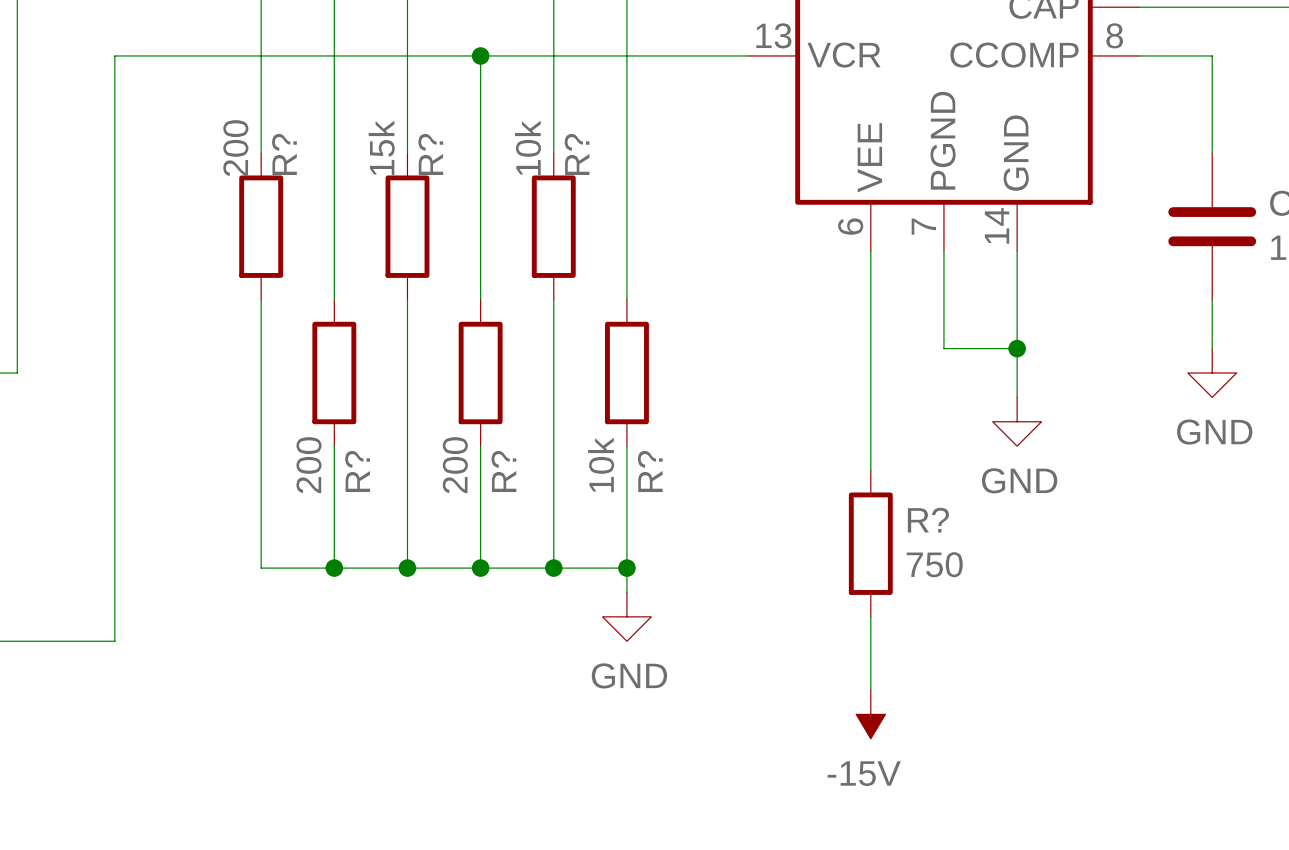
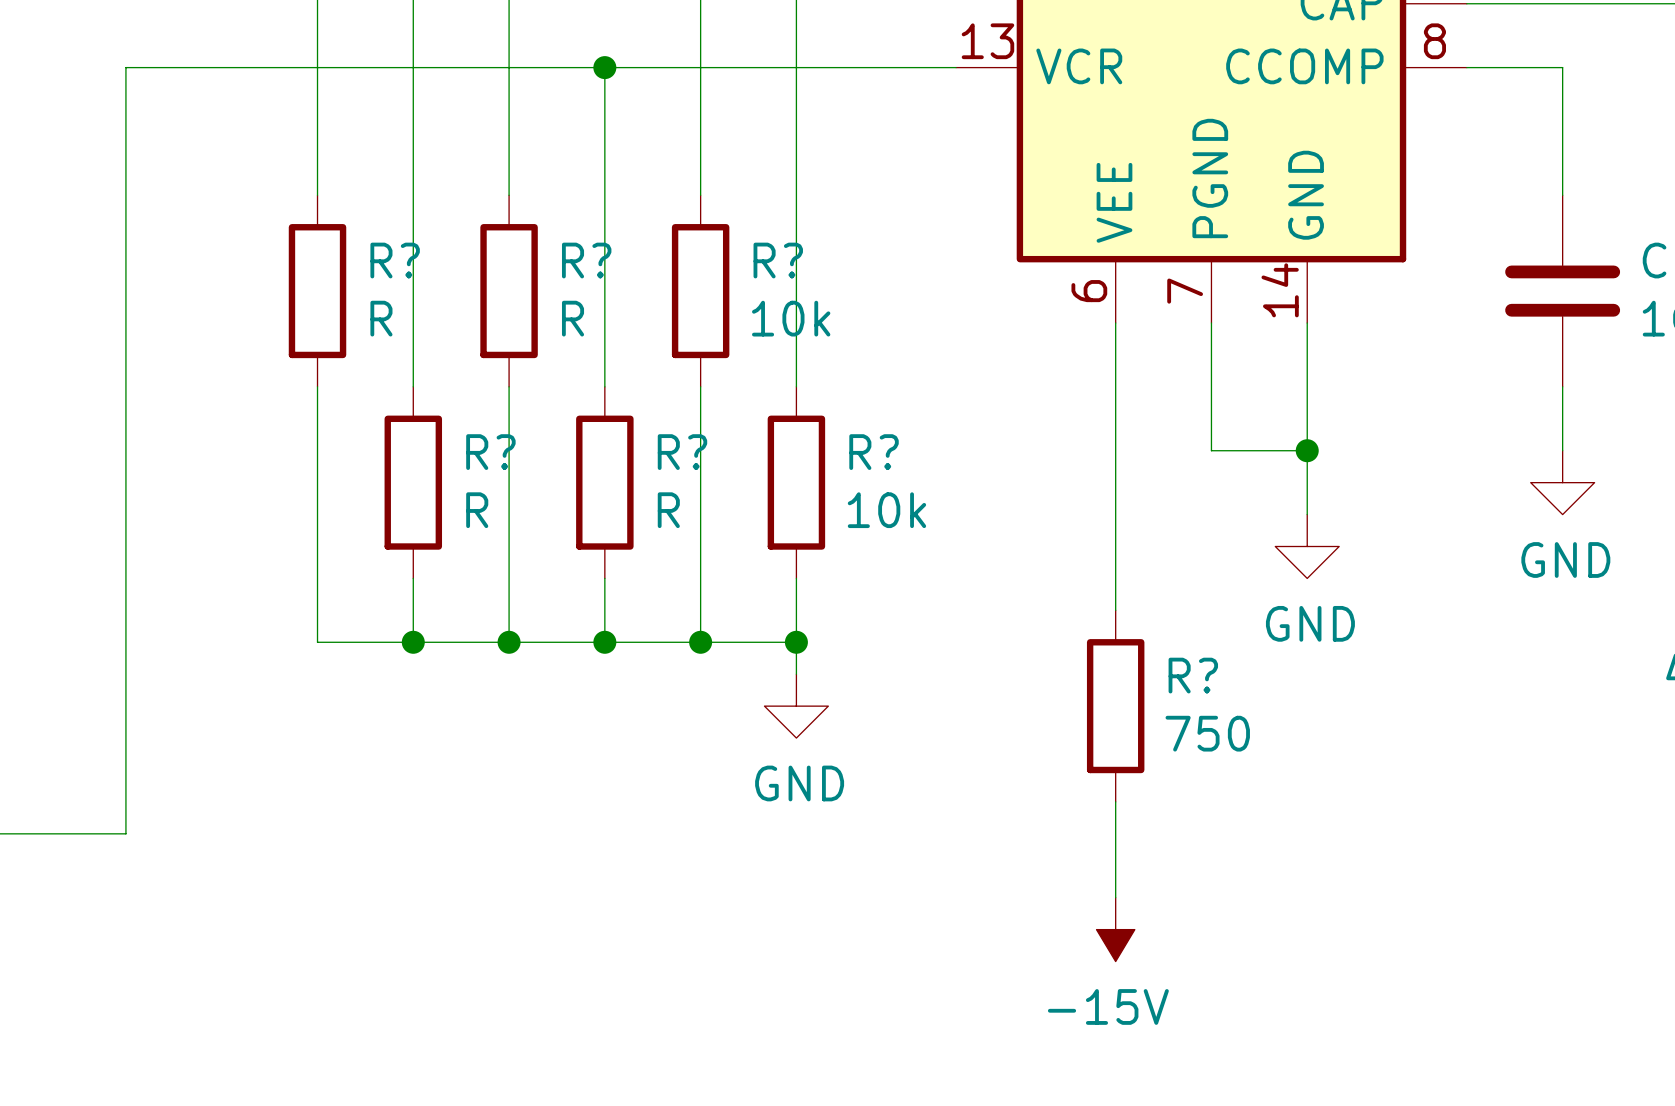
R? value: 15k (381, 147) -> R (573, 318)
R? value rotation: 0° (528, 147) -> 90° clockwise (791, 318)
R? value position: 10k (528, 147) -> 10k (791, 318)
R? value: 200 (235, 148) -> R (381, 318)
R? name rotation: 0° (284, 154) -> 90° clockwise (395, 260)
R? name position: R? (284, 154) -> R? (395, 260)
R? name rotation: 0° (430, 154) -> 90° clockwise (586, 260)
R? name position: R? (430, 154) -> R? (586, 260)
R? name rotation: 0° (577, 154) -> 90° clockwise (778, 260)
R? name position: R? (577, 154) -> R? (778, 260)
R? value rotation: 0° (601, 464) -> 90° clockwise (886, 510)
R? value position: 10k (601, 464) -> 10k (886, 510)
R? value: 200 (309, 465) -> R (477, 510)
R? value: 200 (455, 465) -> R (668, 510)
R? name rotation: 0° (357, 471) -> 90° clockwise (490, 452)
R? name position: R? (357, 471) -> R? (490, 452)
R? name rotation: 0° (503, 471) -> 90° clockwise (682, 452)
R? name position: R? (503, 471) -> R? (682, 452)
R? name rotation: 0° (650, 471) -> 90° clockwise (874, 452)
R? name position: R? (650, 471) -> R? (874, 452)
wire: (261, 494) (261, 568) (626, 568) -> (317, 642) (796, 642)
wire: (334, 494) (334, 568) -> none
junction: none -> (413, 642)
wire: (407, 494) (407, 568) -> none
junction: none -> (509, 642)
wire: (480, 494) (480, 568) -> none
junction: none -> (604, 642)
wire: (553, 494) (553, 568) -> none
junction: none -> (700, 642)
junction: none -> (796, 642)
wire: (626, 519) (626, 592) -> none
junction: (334, 568) -> none
junction: (407, 568) -> none
junction: (480, 568) -> none
junction: (553, 568) -> none
junction: (626, 568) -> none
power symbol position: GND (626, 616) -> GND (796, 706)

